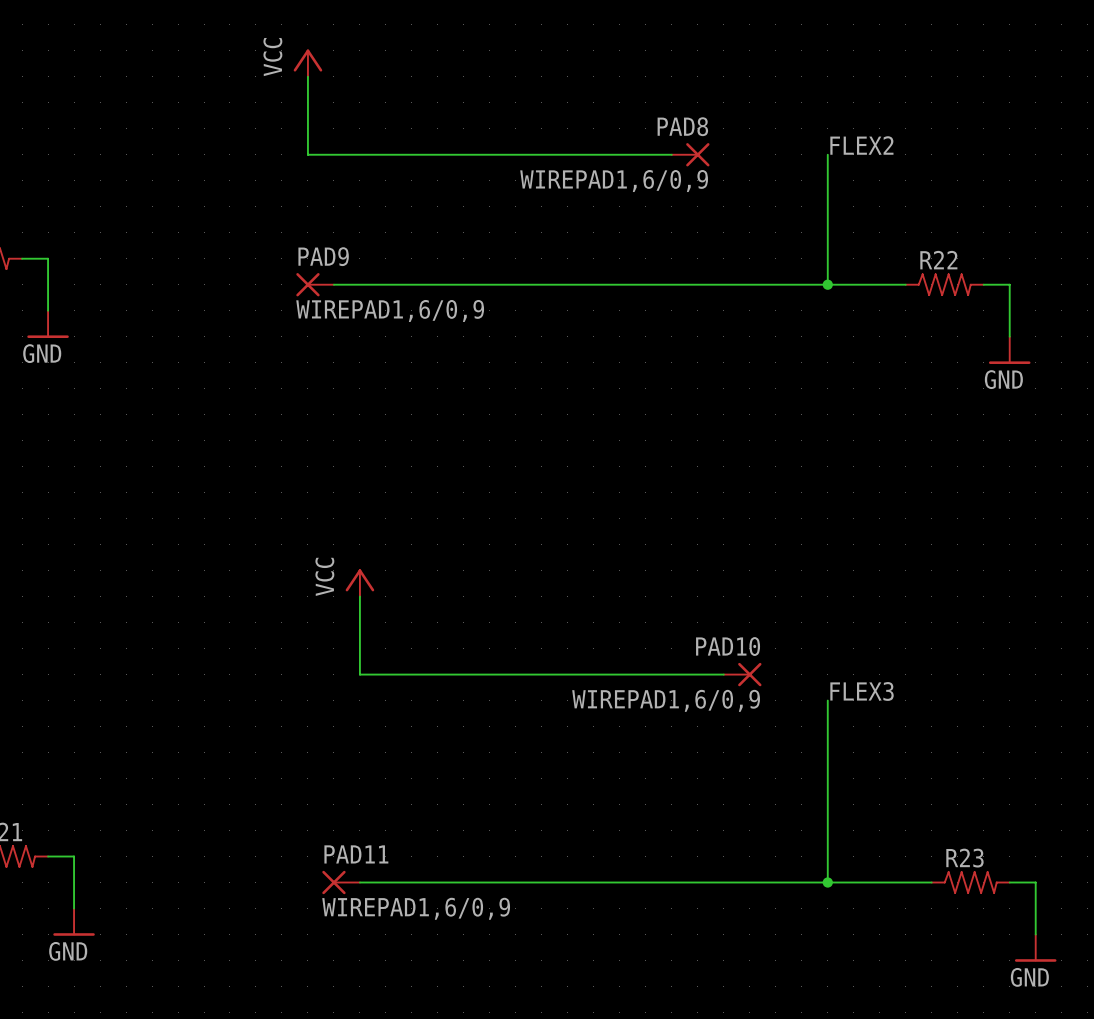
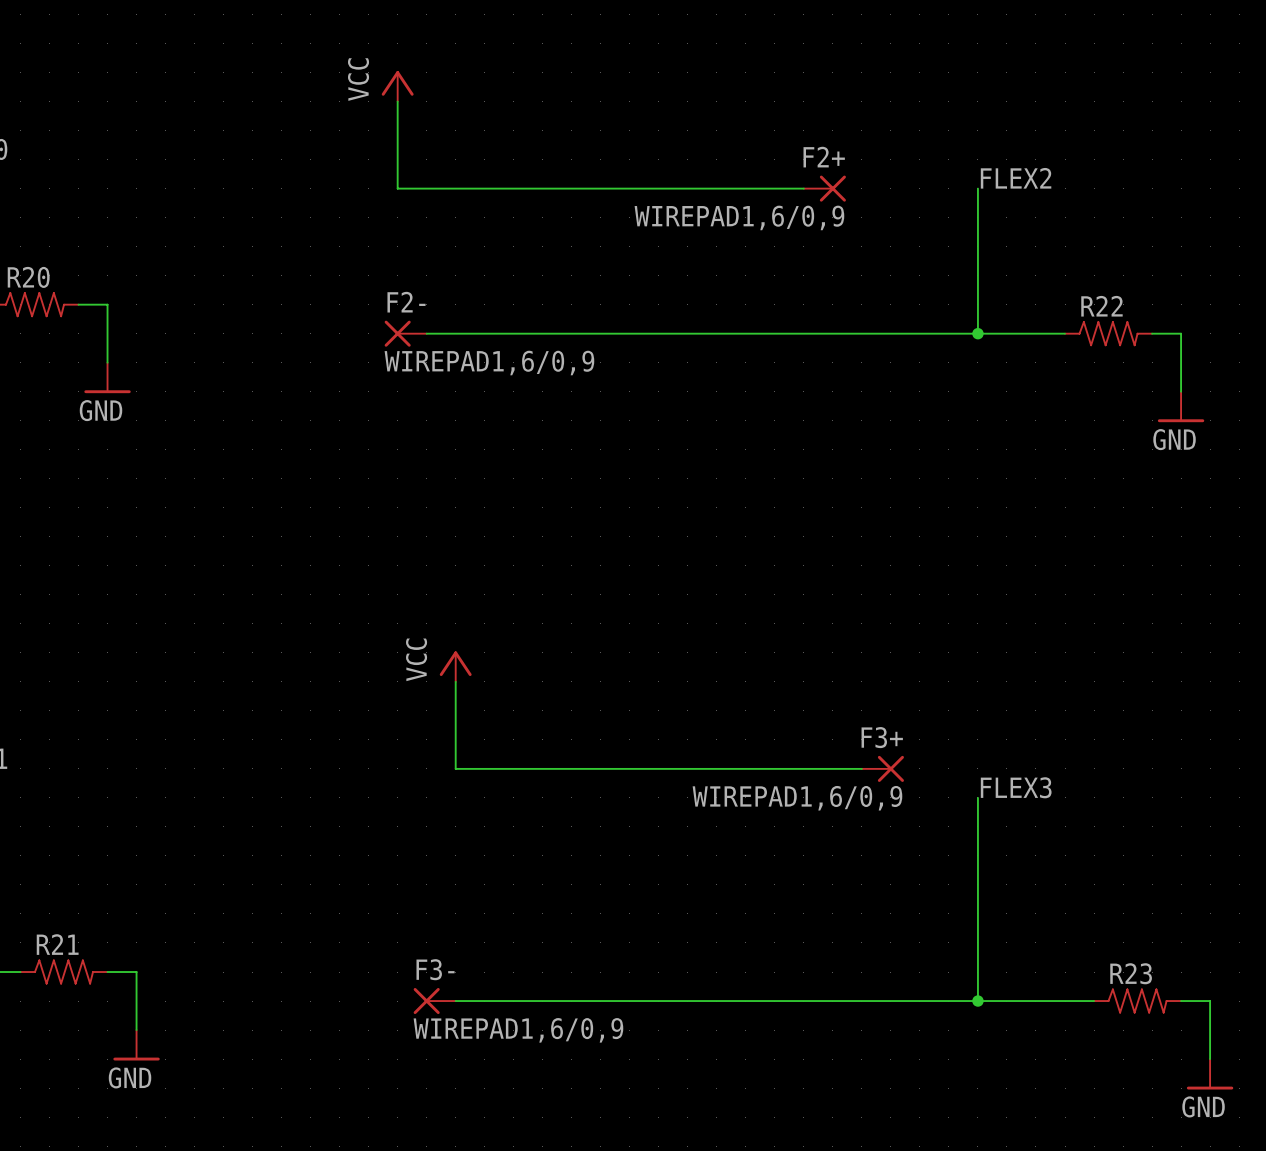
PAD8 name: PAD8 (682, 126) -> F2+ (824, 157)
PAD9 name: PAD9 (323, 256) -> F2- (406, 302)
PAD10 name: PAD10 (728, 646) -> F3+ (882, 737)
PAD11 name: PAD11 (356, 854) -> F3- (435, 969)

